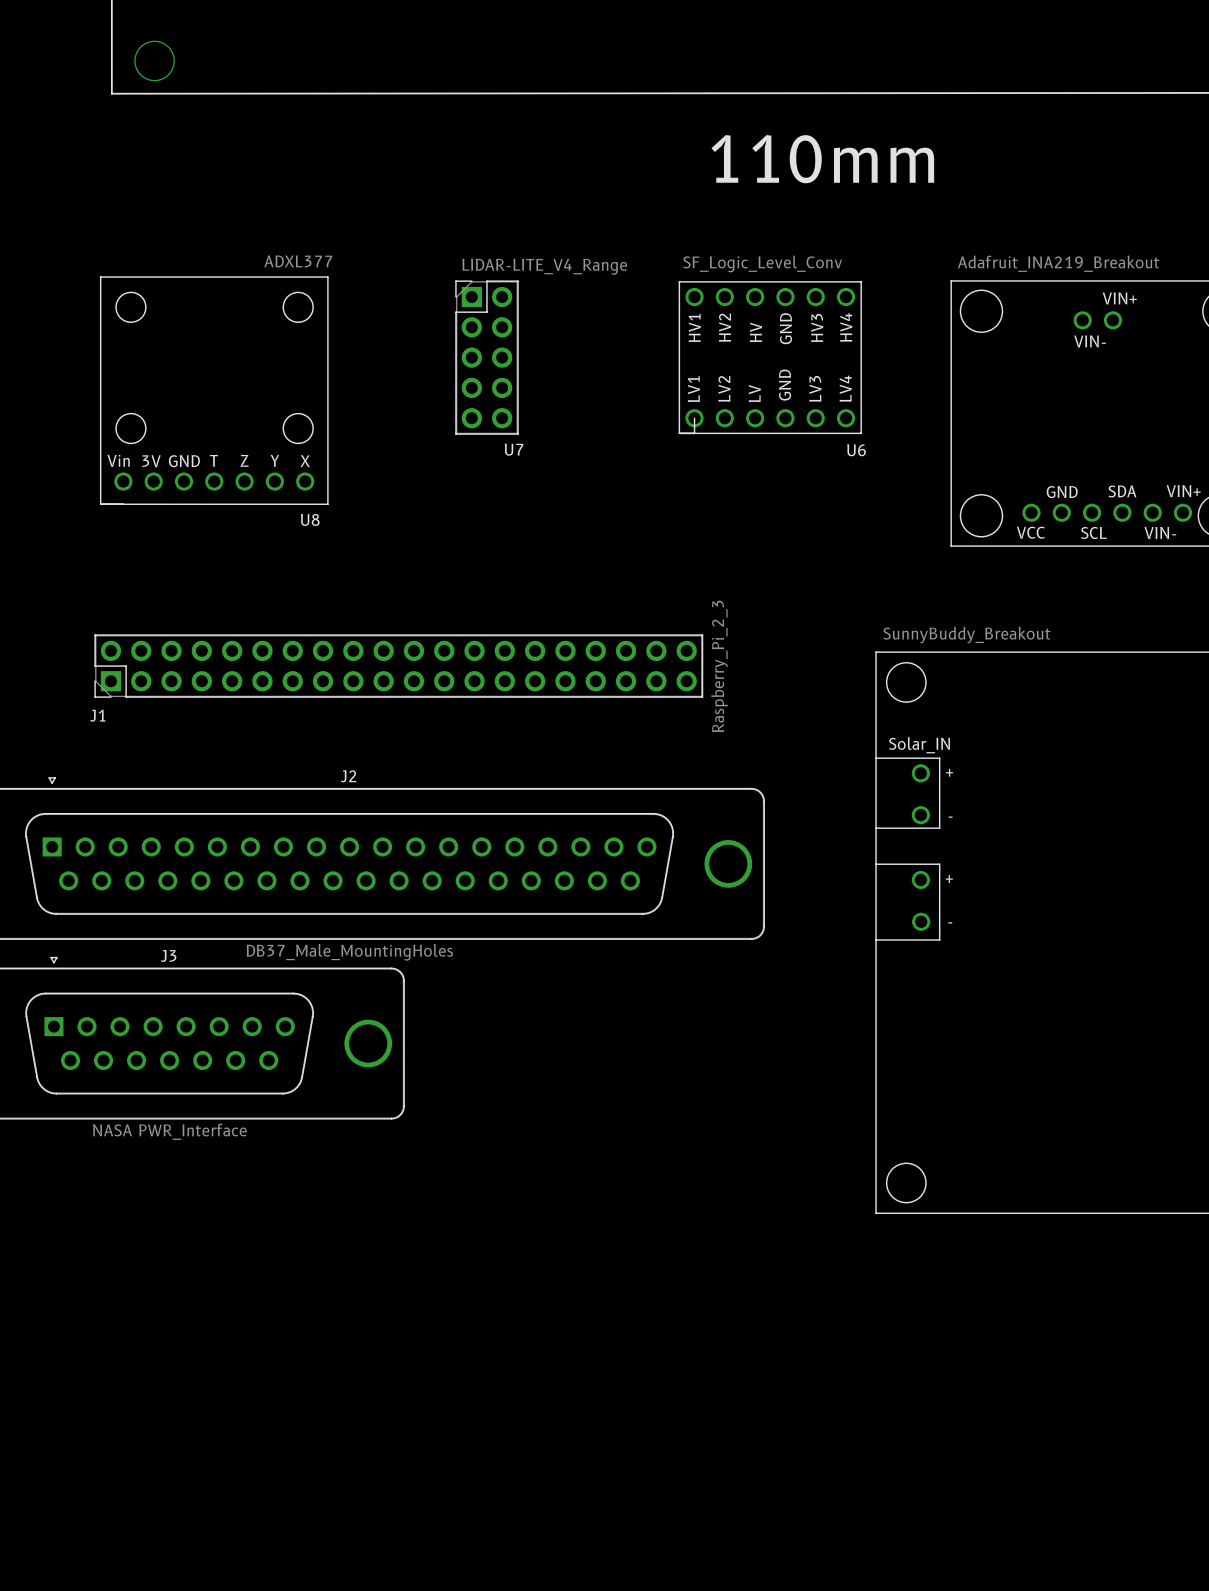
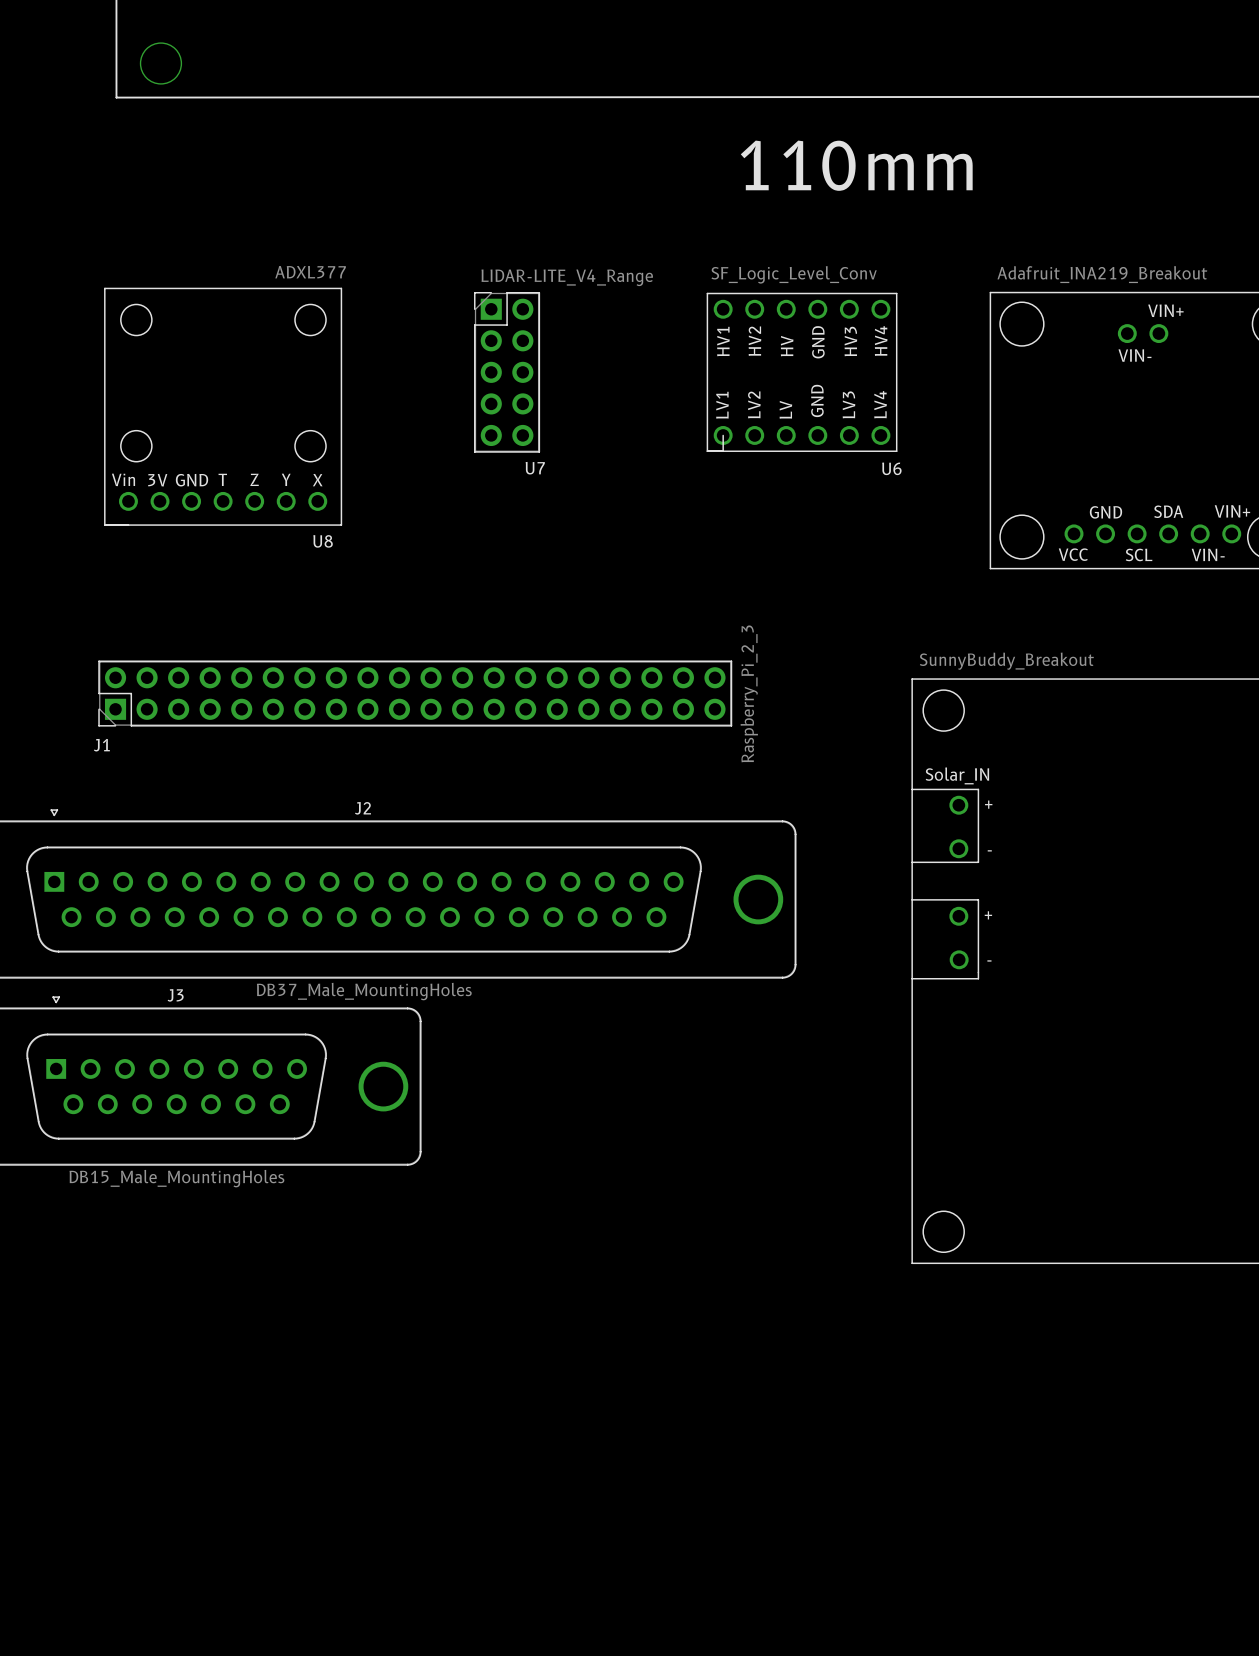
J3 value: NASA PWR_Interface (169, 1131) -> DB15_Male_MountingHoles (176, 1178)

